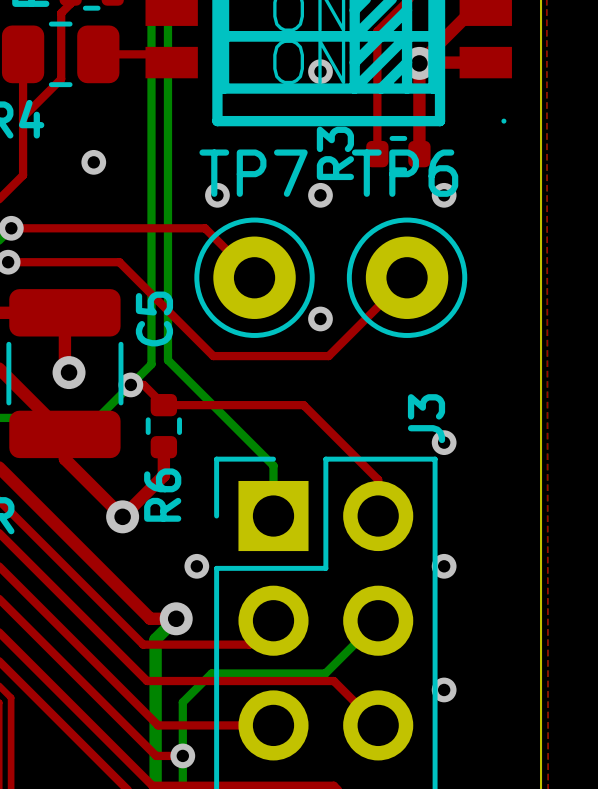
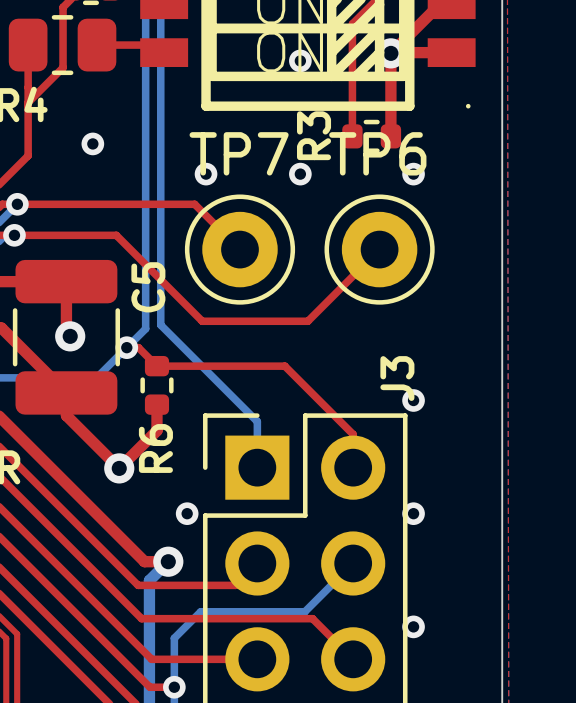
via: (320, 318) -> none

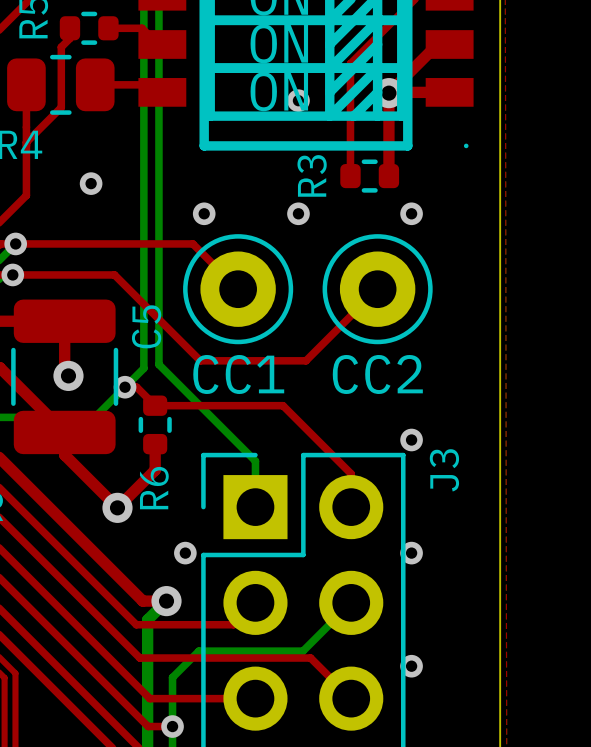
TP7 name: TP7 (239, 153) -> CC1 (238, 374)
TP6 name: TP6 (377, 153) -> CC2 (377, 374)
J3 name position: J3 (397, 378) -> J3 (444, 470)

